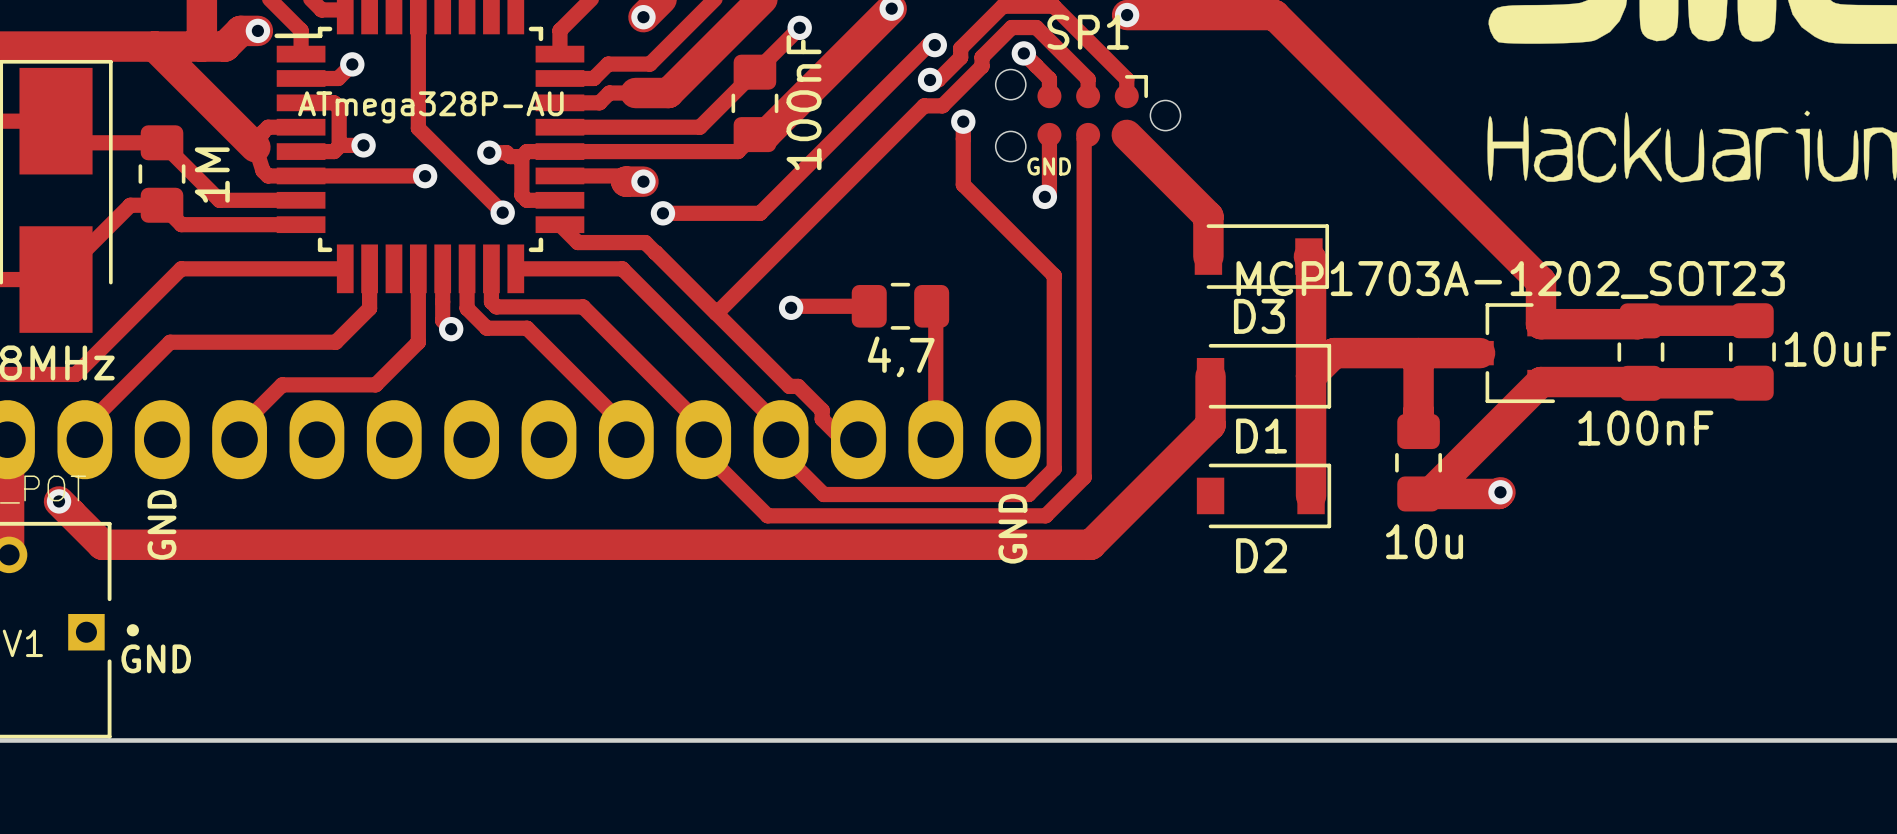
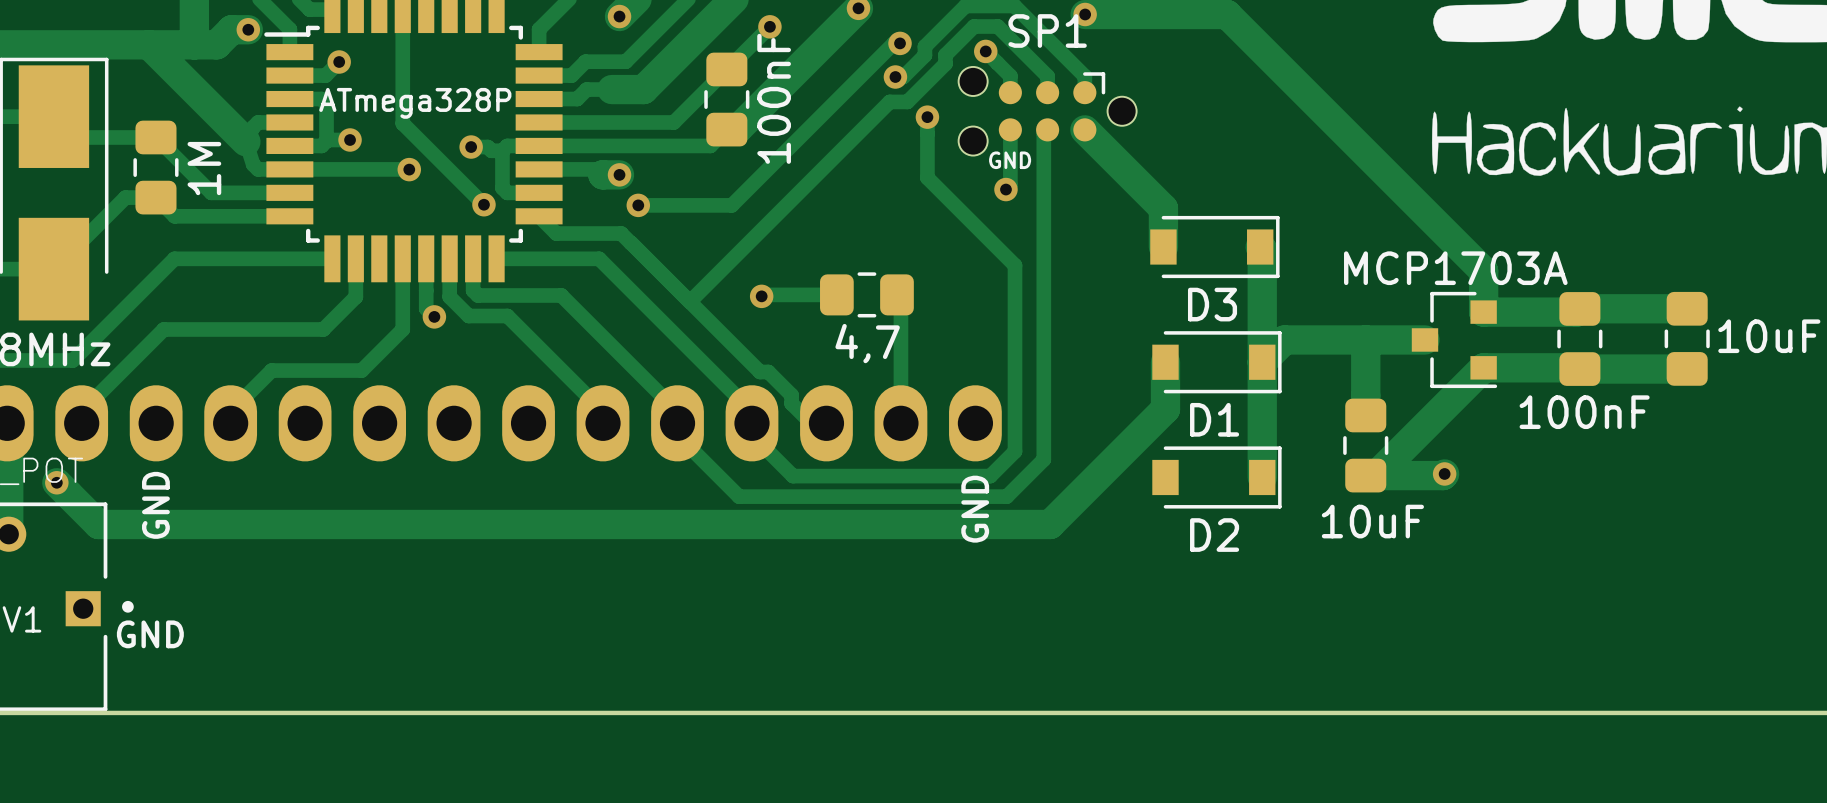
part value: ATmega328P-AU (430, 107) -> ATmega328P (415, 103)
part value: MCP1703A-1202_SOT23 (1510, 280) -> MCP1703A (1455, 268)
part value: 10u (1424, 541) -> 10uF (1372, 521)

